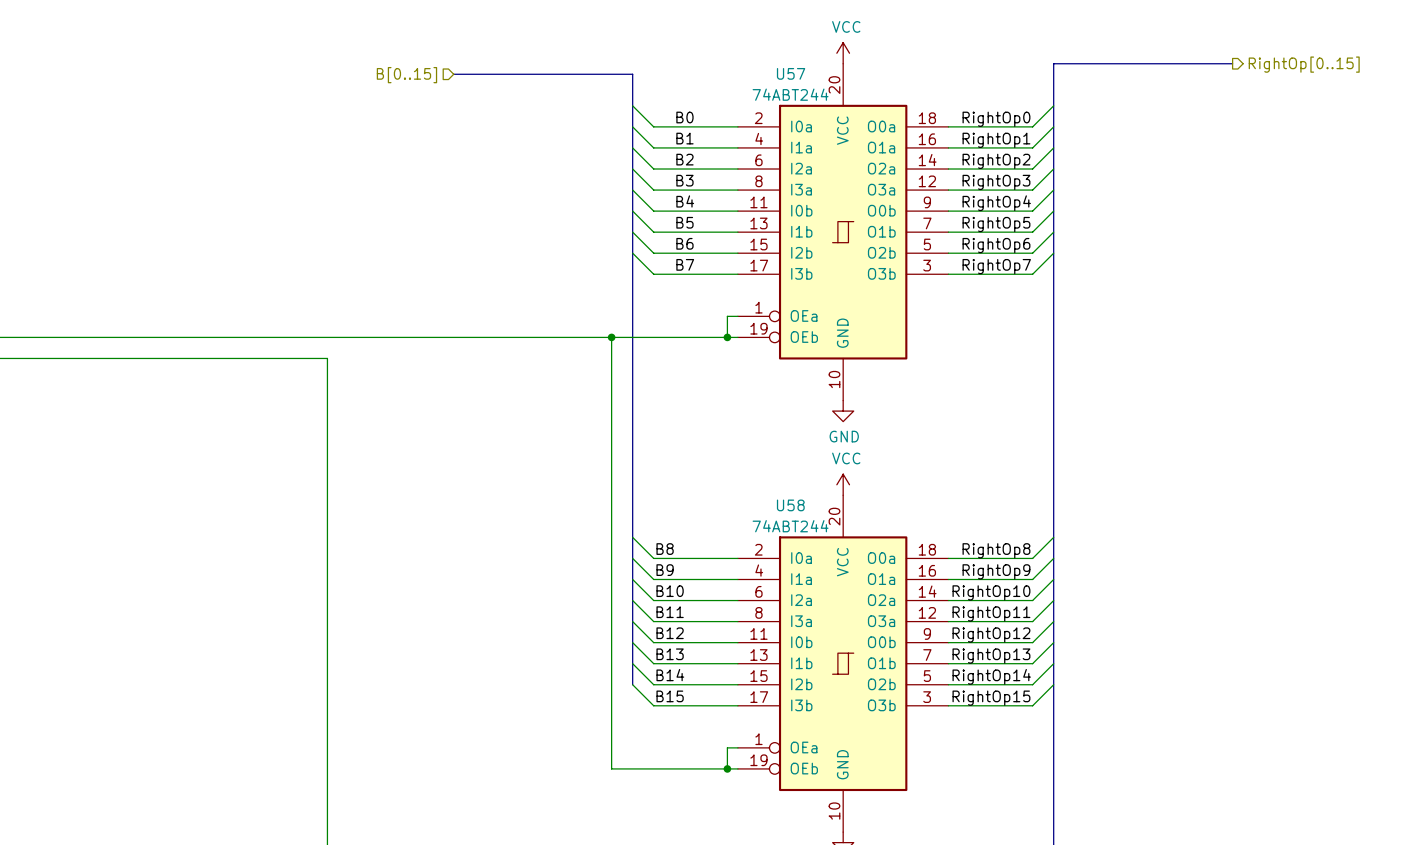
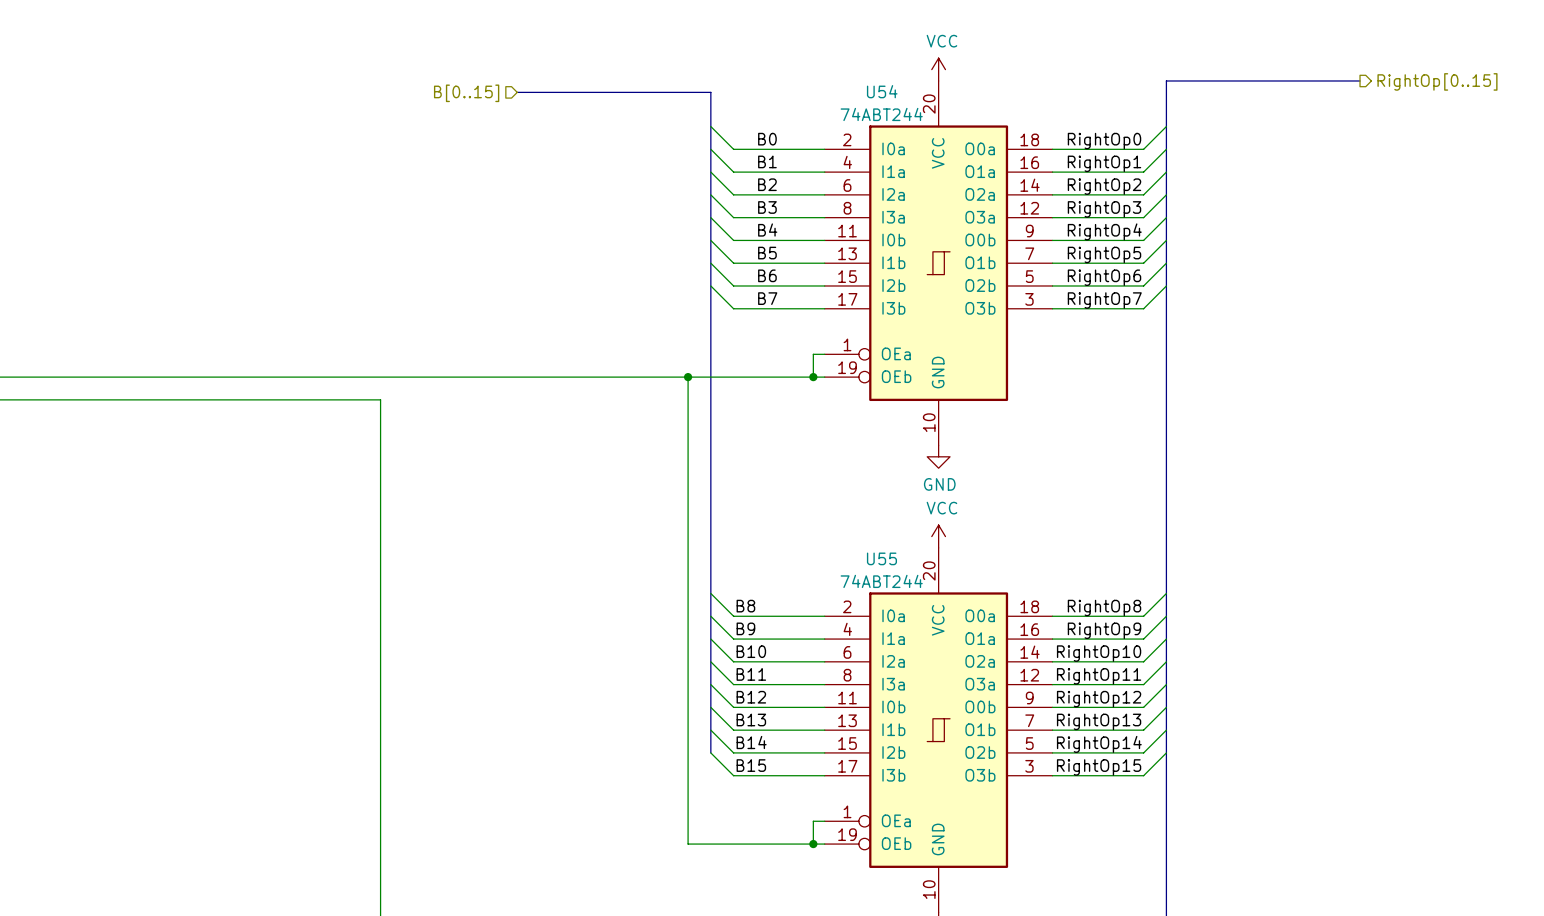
U57 name: U57 (791, 73) -> U54 (882, 91)
U58 name: U58 (790, 505) -> U55 (881, 558)

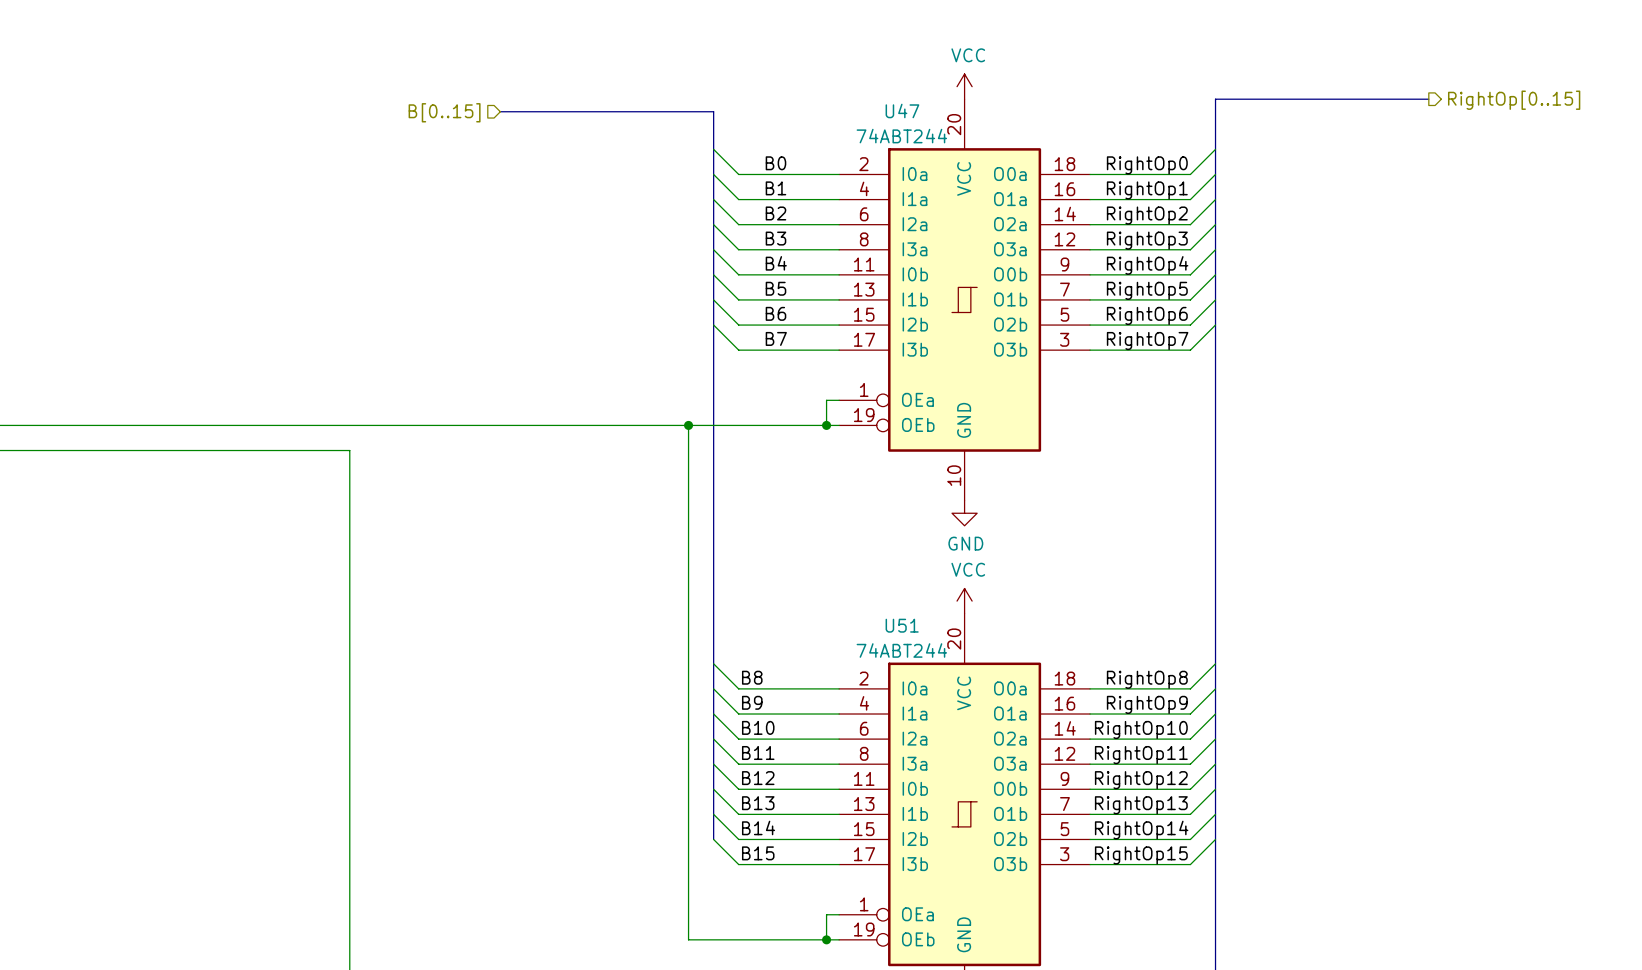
U54 name: U54 (882, 91) -> U47 (902, 110)
U55 name: U55 (881, 558) -> U51 (902, 625)

